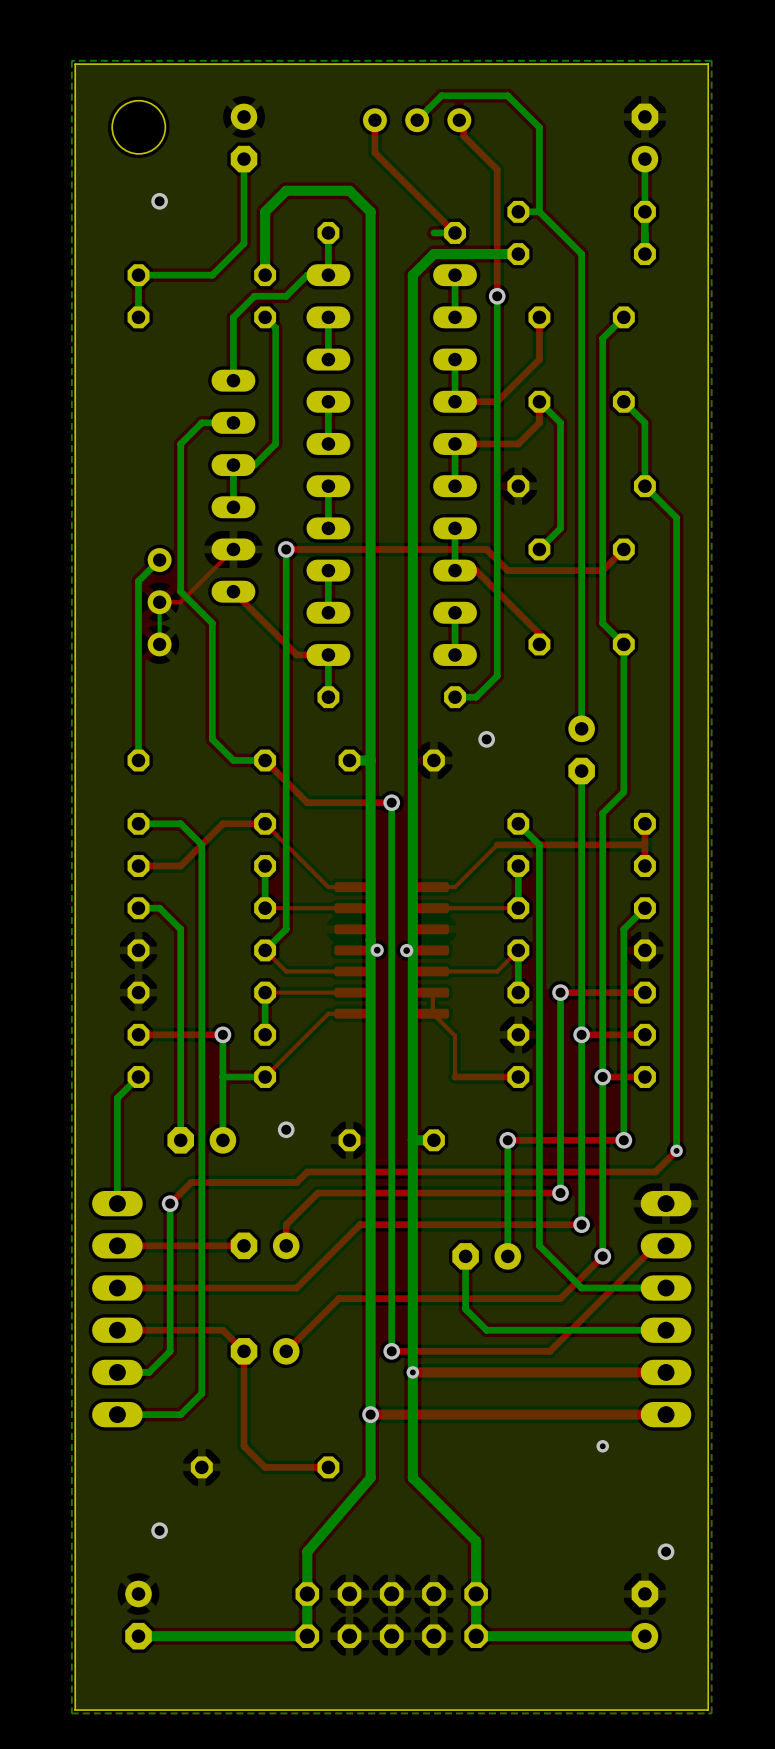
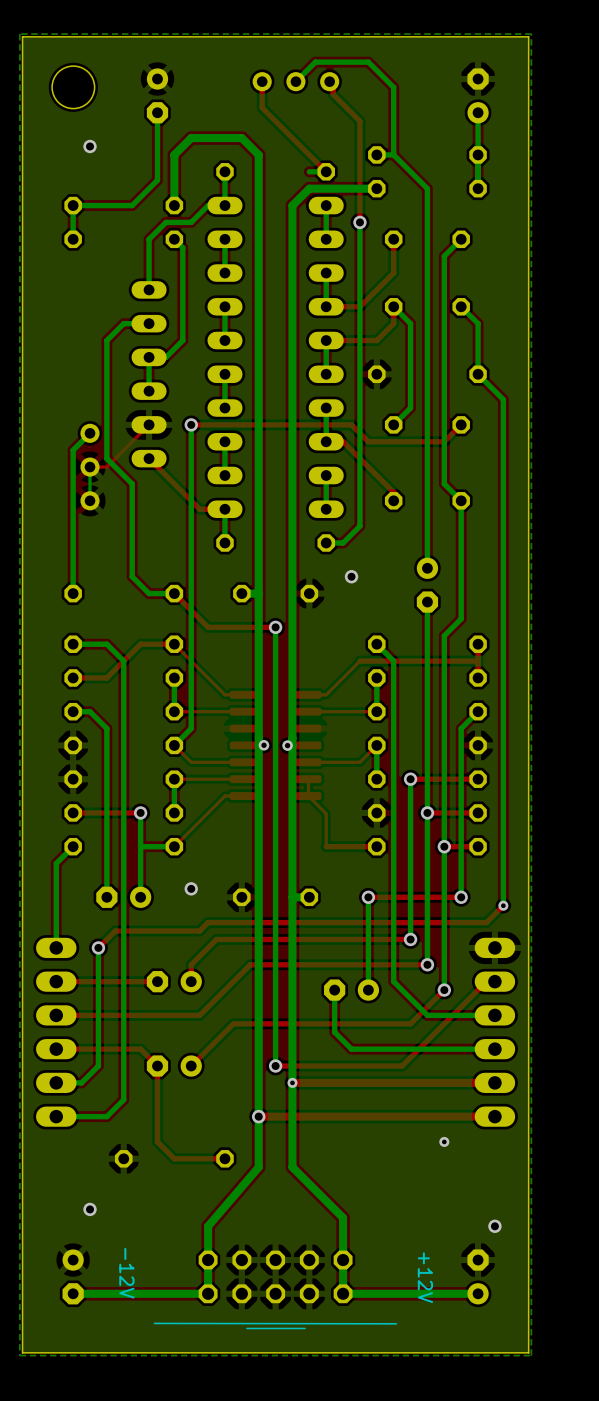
text: none -> -12V (126, 1273)
text: none -> +12V (425, 1277)
line: none -> (154, 1323) (396, 1323)
line: none -> (305, 1328) (246, 1328)

